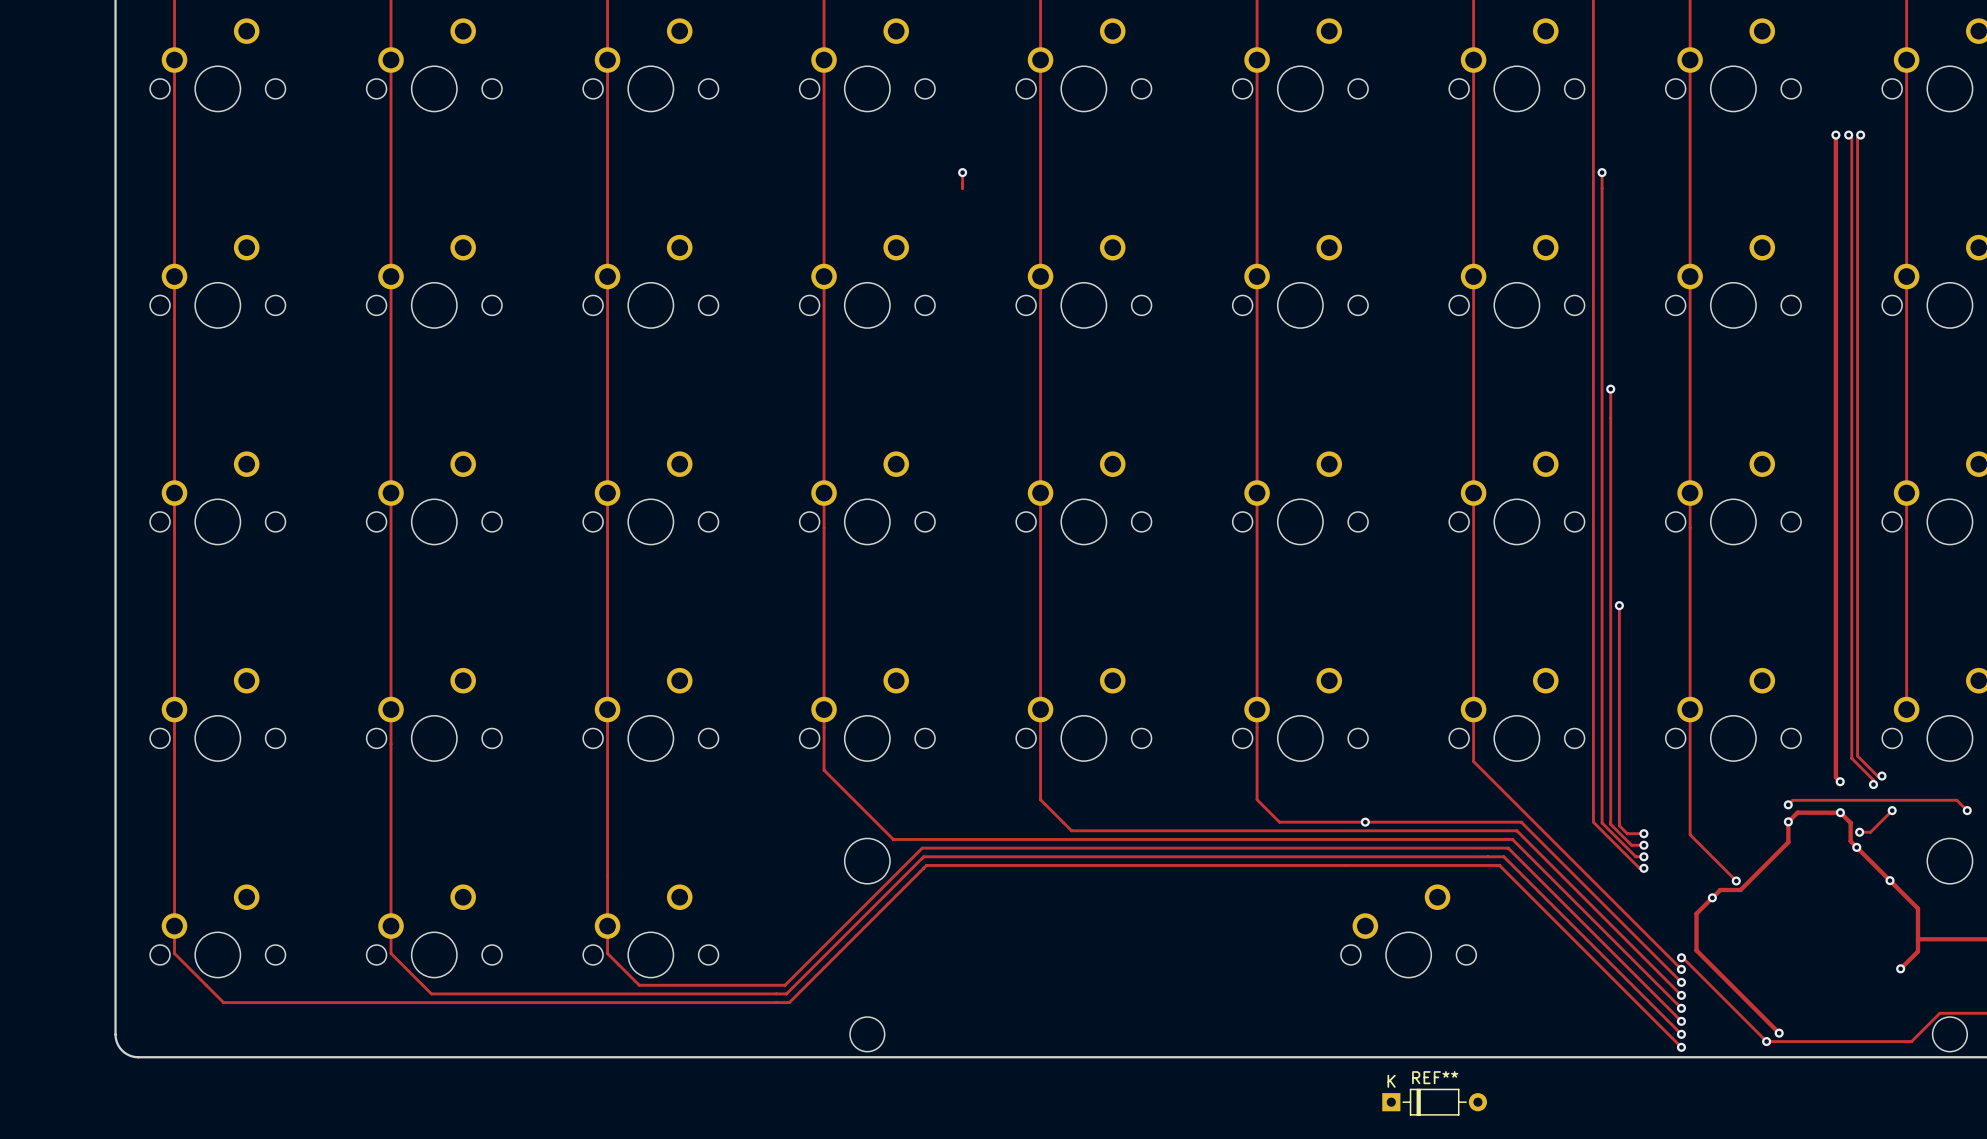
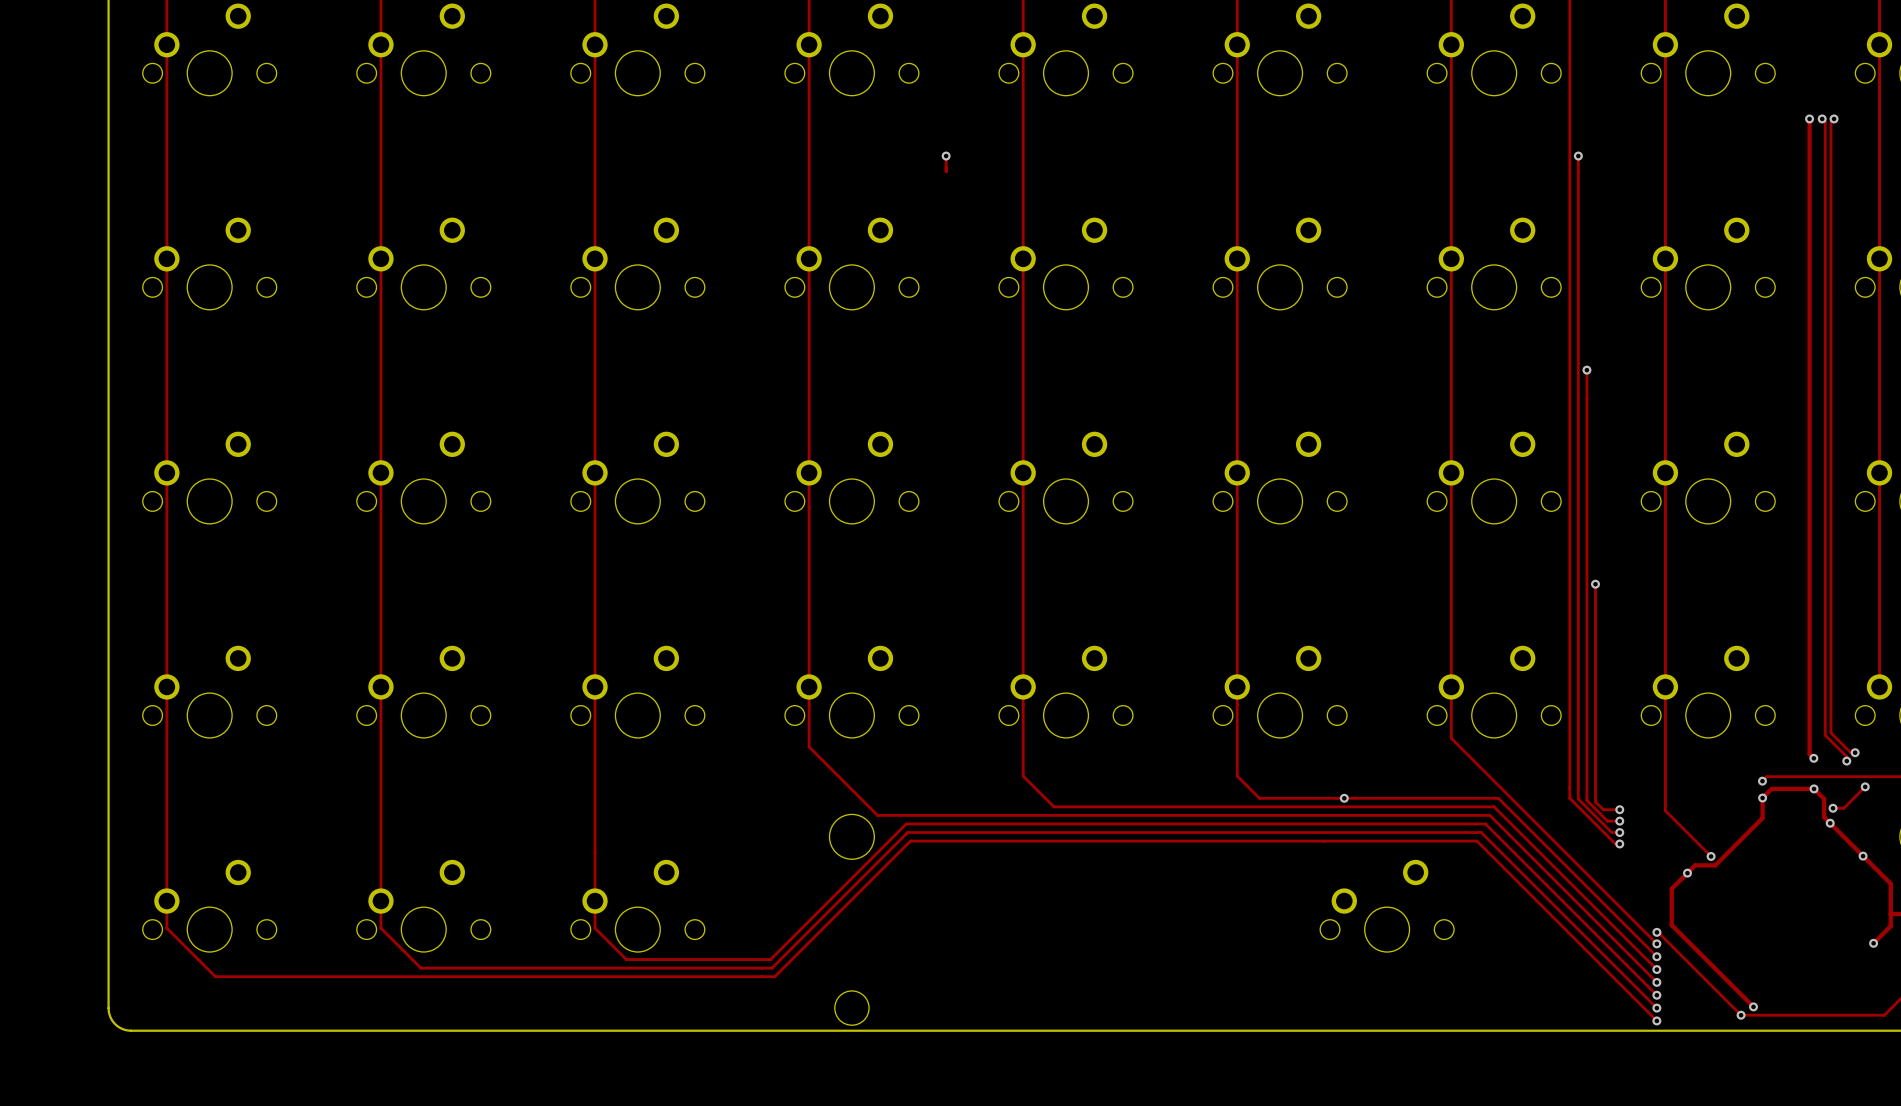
REF**: (1434, 1102) -> none

